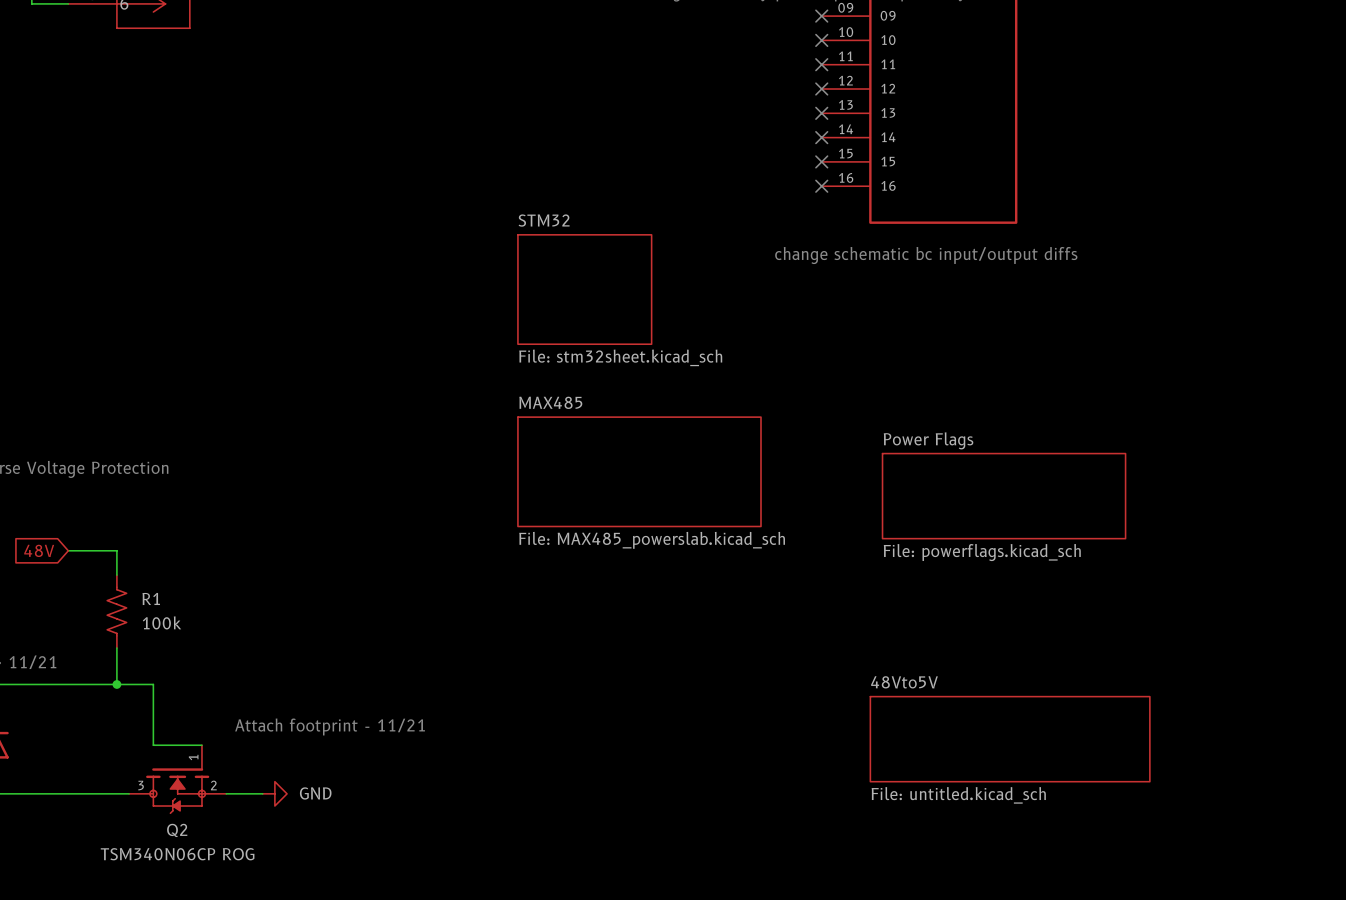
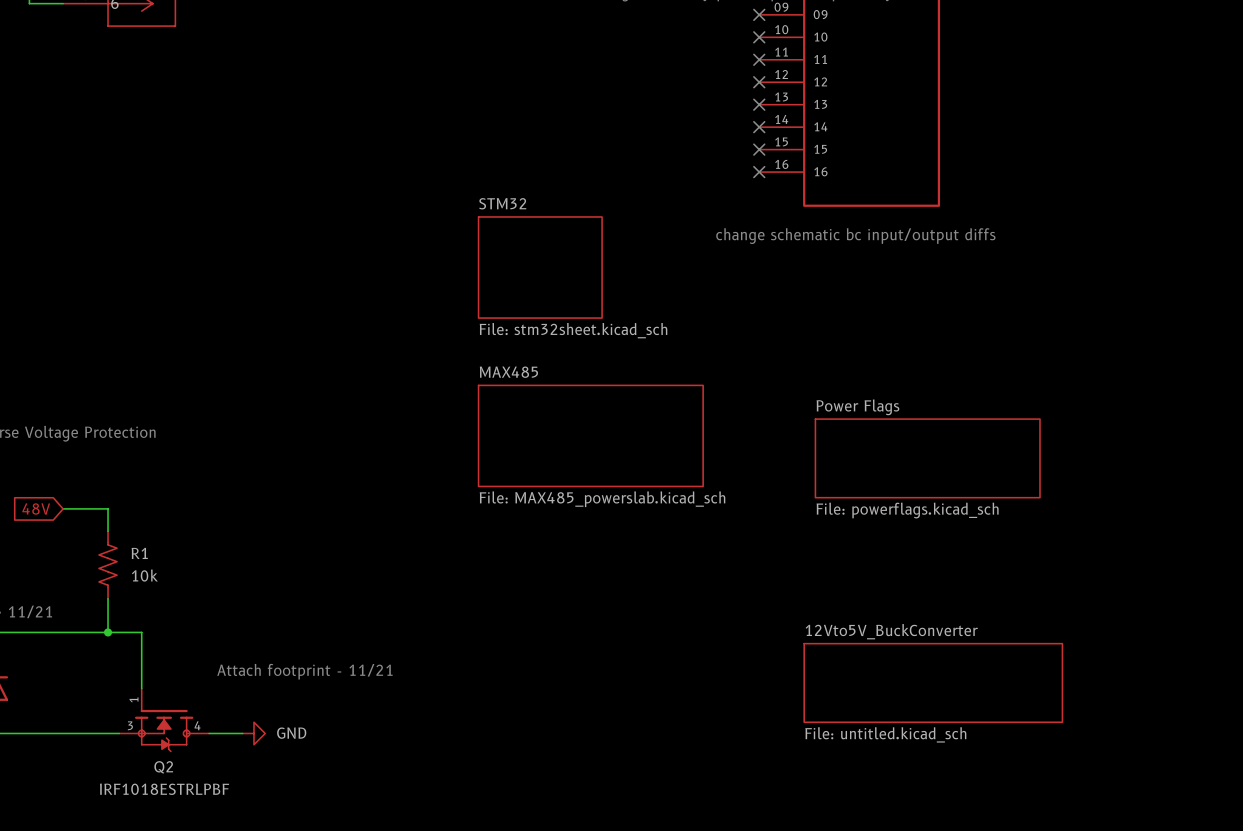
R1 value: 100k (161, 622) -> 10k (144, 575)
sheet 48Vto5V name: 48Vto5V (904, 682) -> 12Vto5V_BuckConverter (891, 631)
Q2 symbol: [129, 745, 227, 815] -> [119, 688, 210, 753]
wire: (153, 745) (201, 745) -> none
Q2 value: TSM340N06CP ROG (177, 854) -> IRF1018ESTRLPBF (164, 789)

